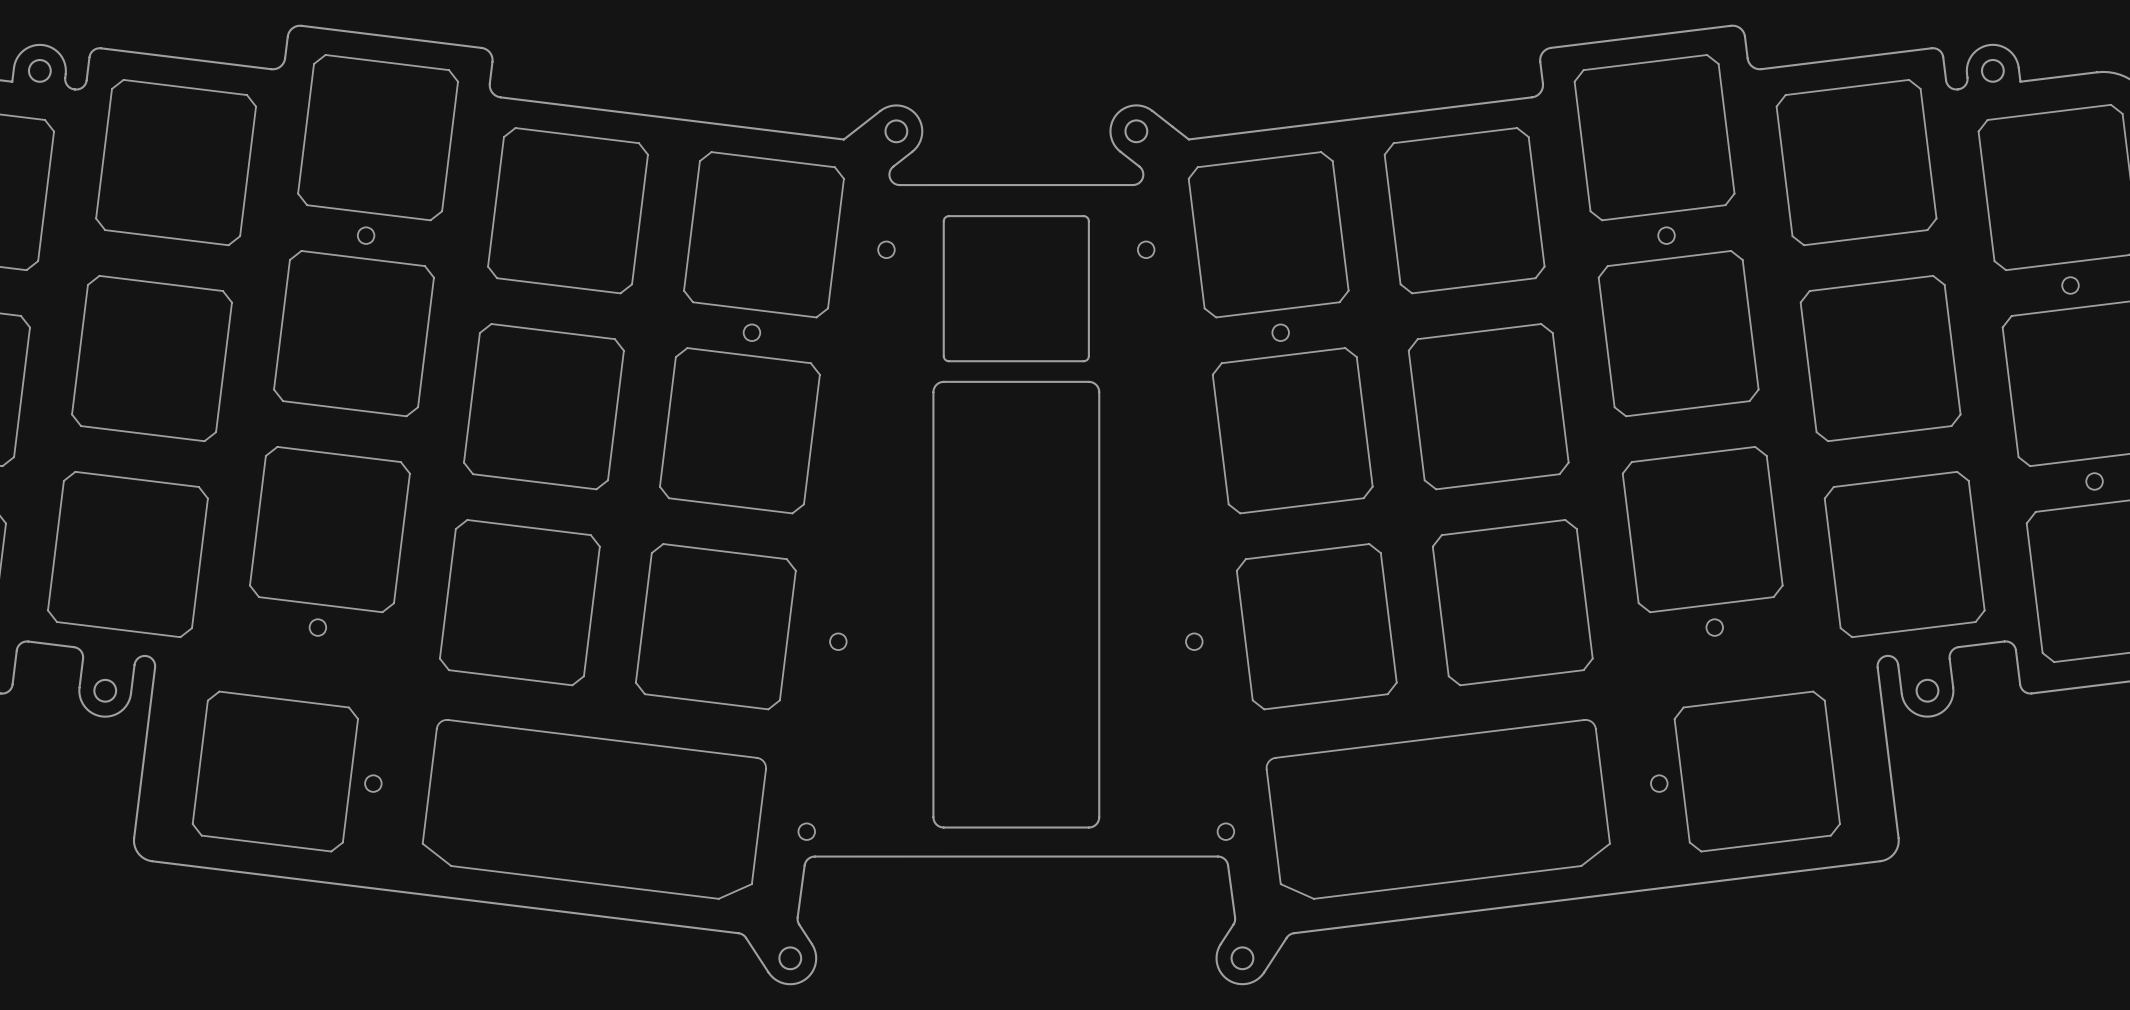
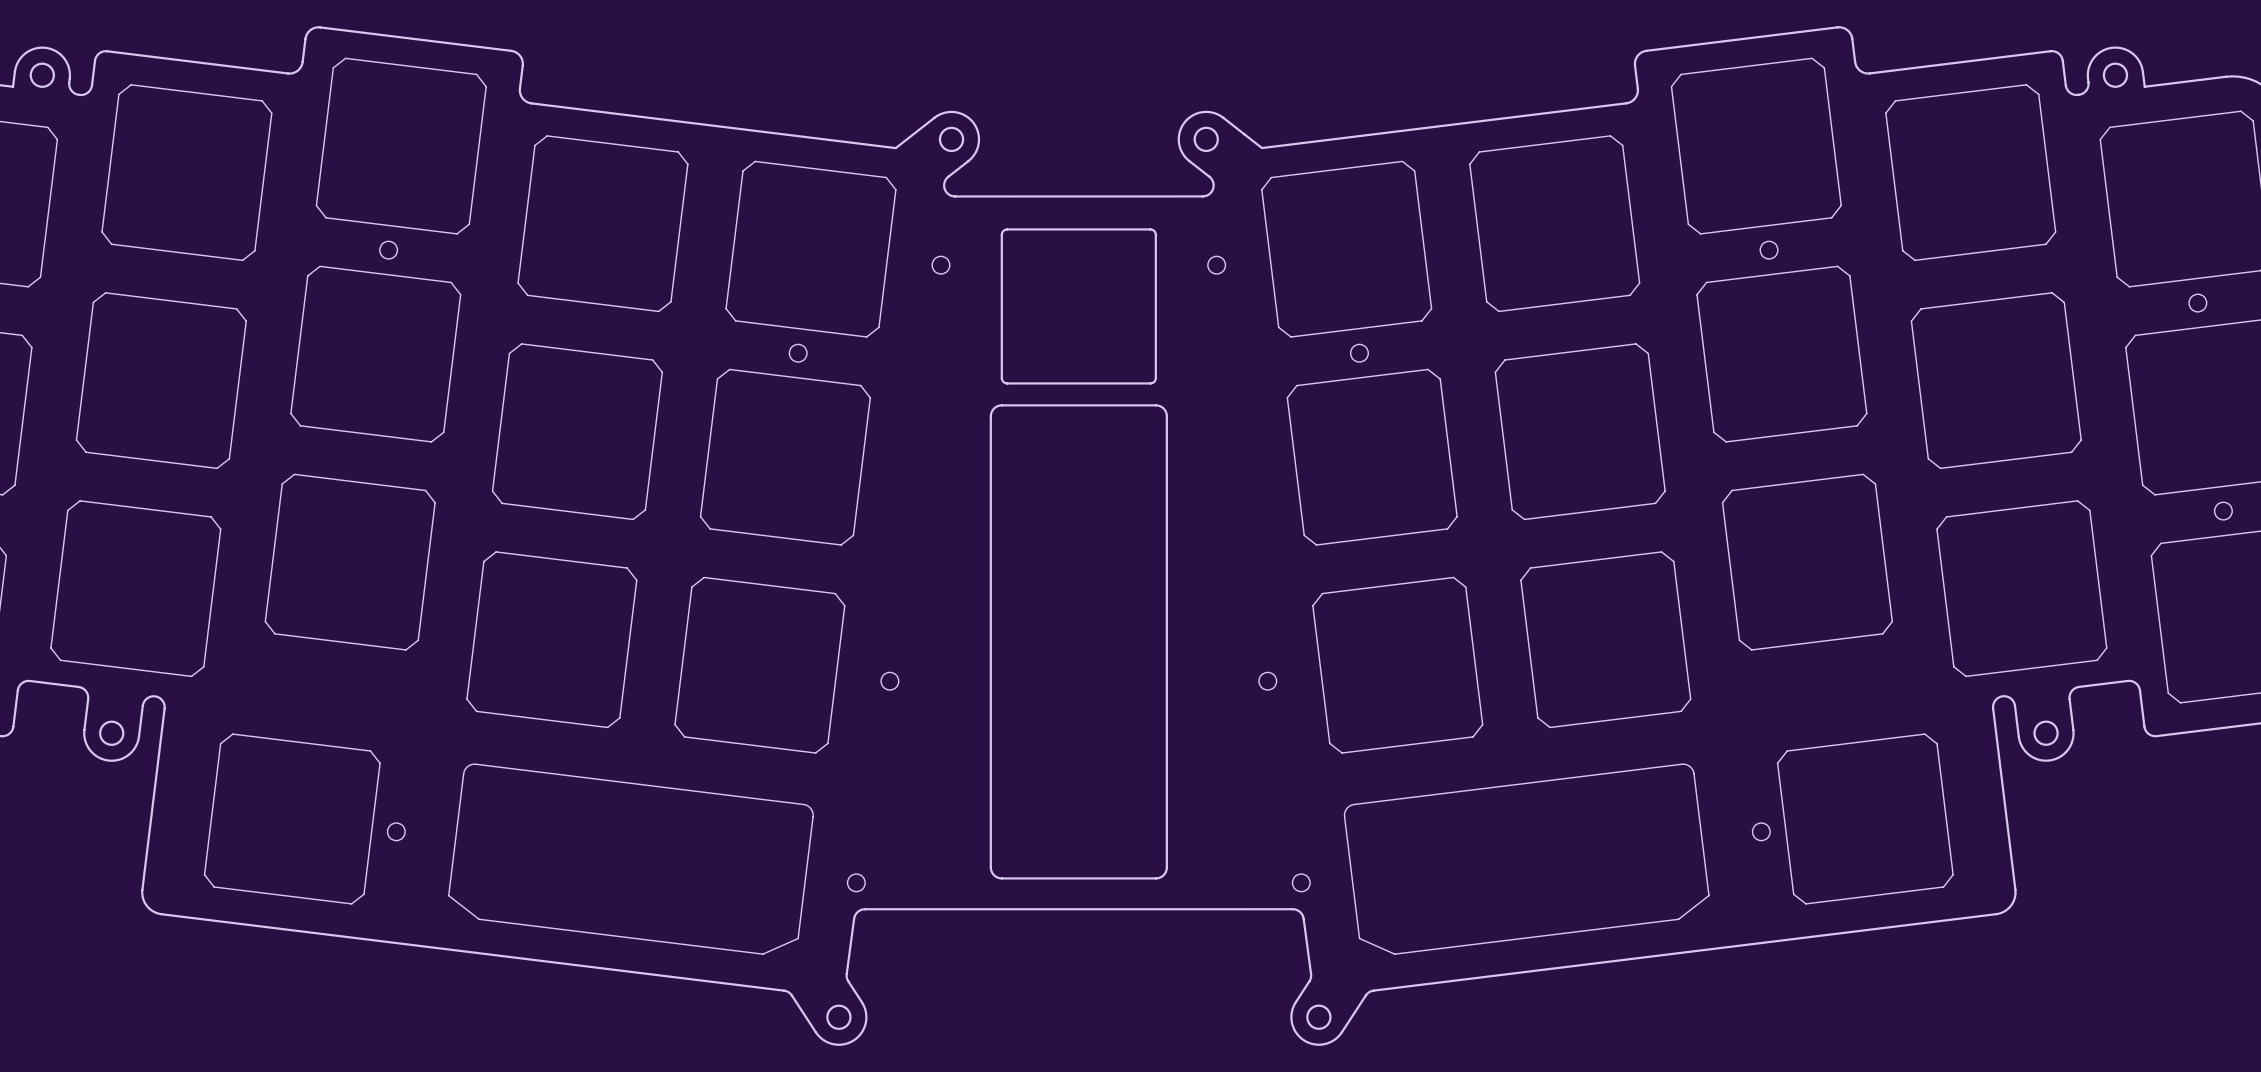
drawing: [309, 619, 327, 637] -> none
drawing: [1706, 619, 1724, 637] -> none

